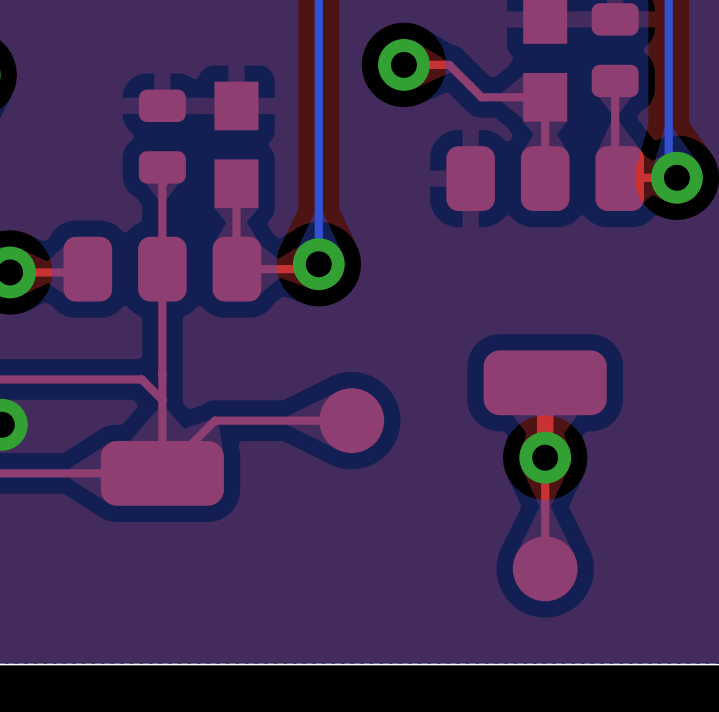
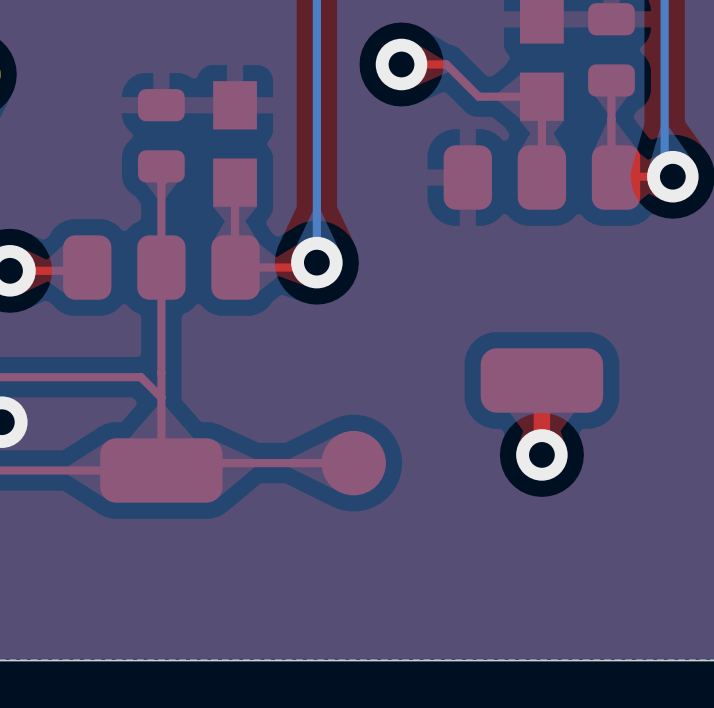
top track: (351, 420) (215, 420) (169, 465) -> (353, 463) (168, 463)
part position: (351, 420) -> (353, 463)
top track: (545, 457) (545, 568) -> none
part: (545, 568) -> none

